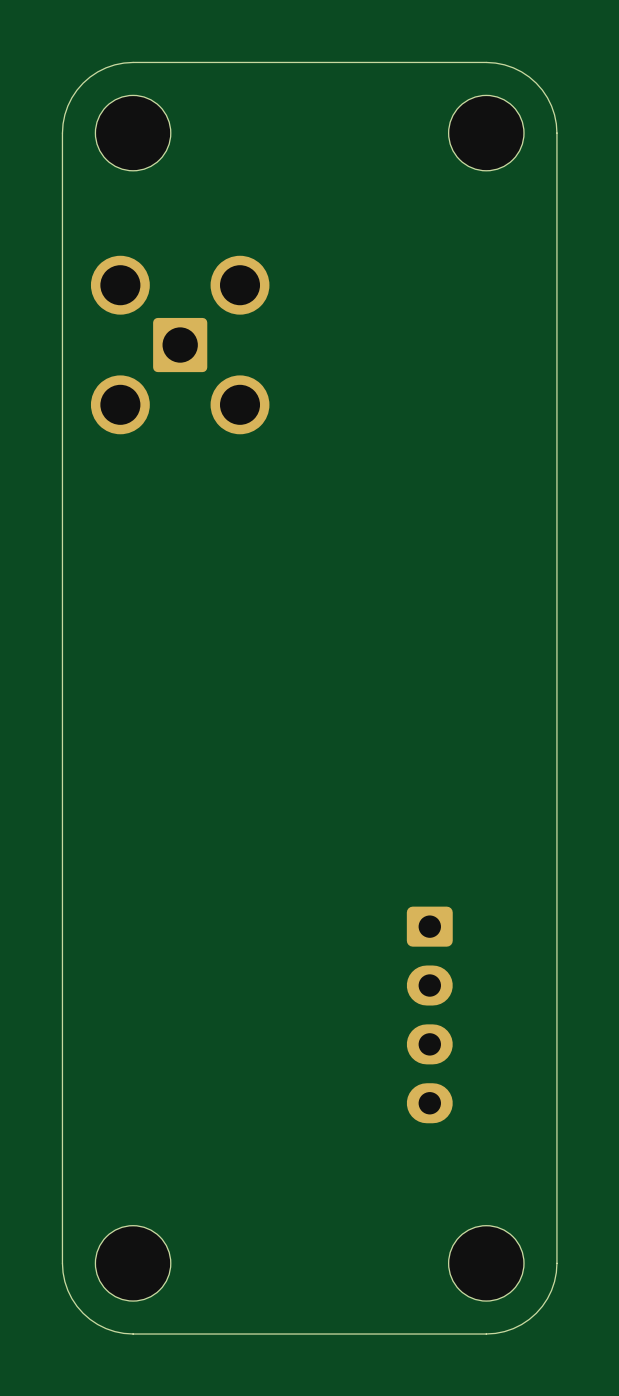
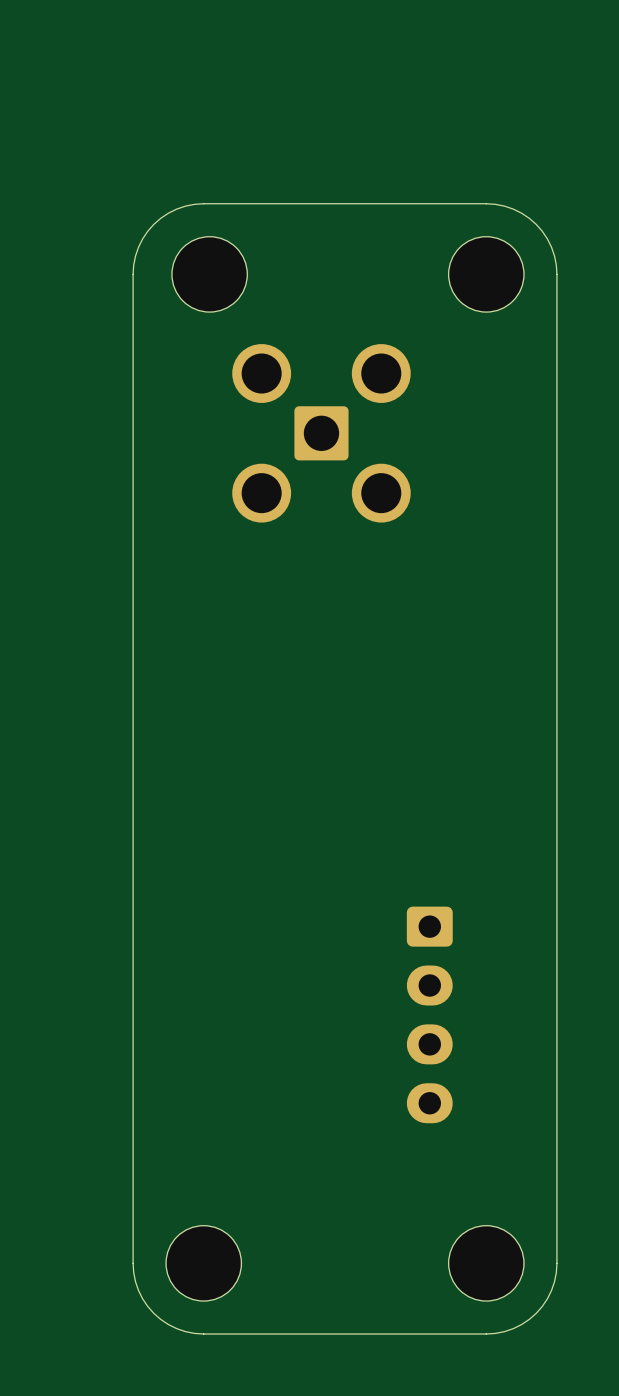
part: (133, 133) -> none
part position: (486, 133) -> (486, 274)
part: none -> (209, 274)
board edge: (556, 274) (556, 133) (554, 114) (547, 97) (536, 83) (521, 71) (504, 64) (486, 62) (123, 63) (106, 67) (90, 77) (77, 90) (64, 114) (62, 133) (63, 1272) (67, 1290) (77, 1306) (90, 1319) (106, 1328) (133, 1334) (203, 1334) -> (556, 274) (551, 247) (536, 224) (513, 209) (486, 203) (194, 204) (176, 209) (160, 218) (147, 231) (135, 256) (133, 274) (133, 1263) (138, 1290) (153, 1313) (176, 1328) (203, 1334)
part position: (180, 345) -> (321, 433)
part position: (133, 1263) -> (203, 1263)

